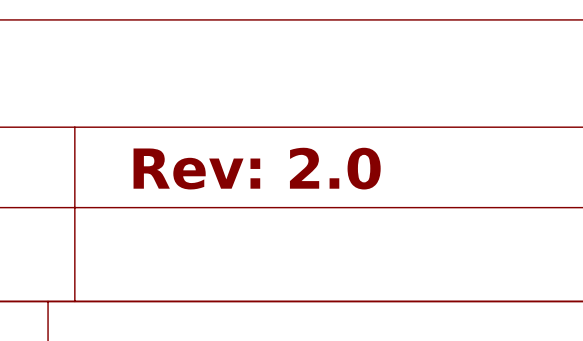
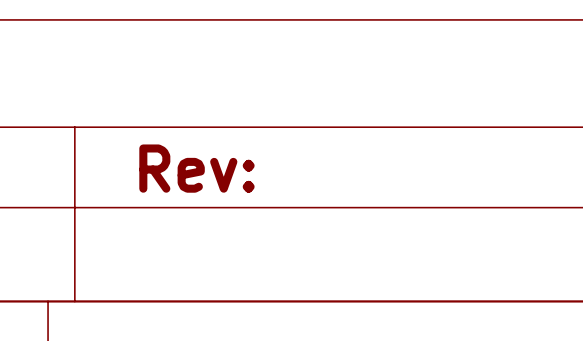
title block: Rev: 2.0 (257, 168) -> Rev: (196, 168)

